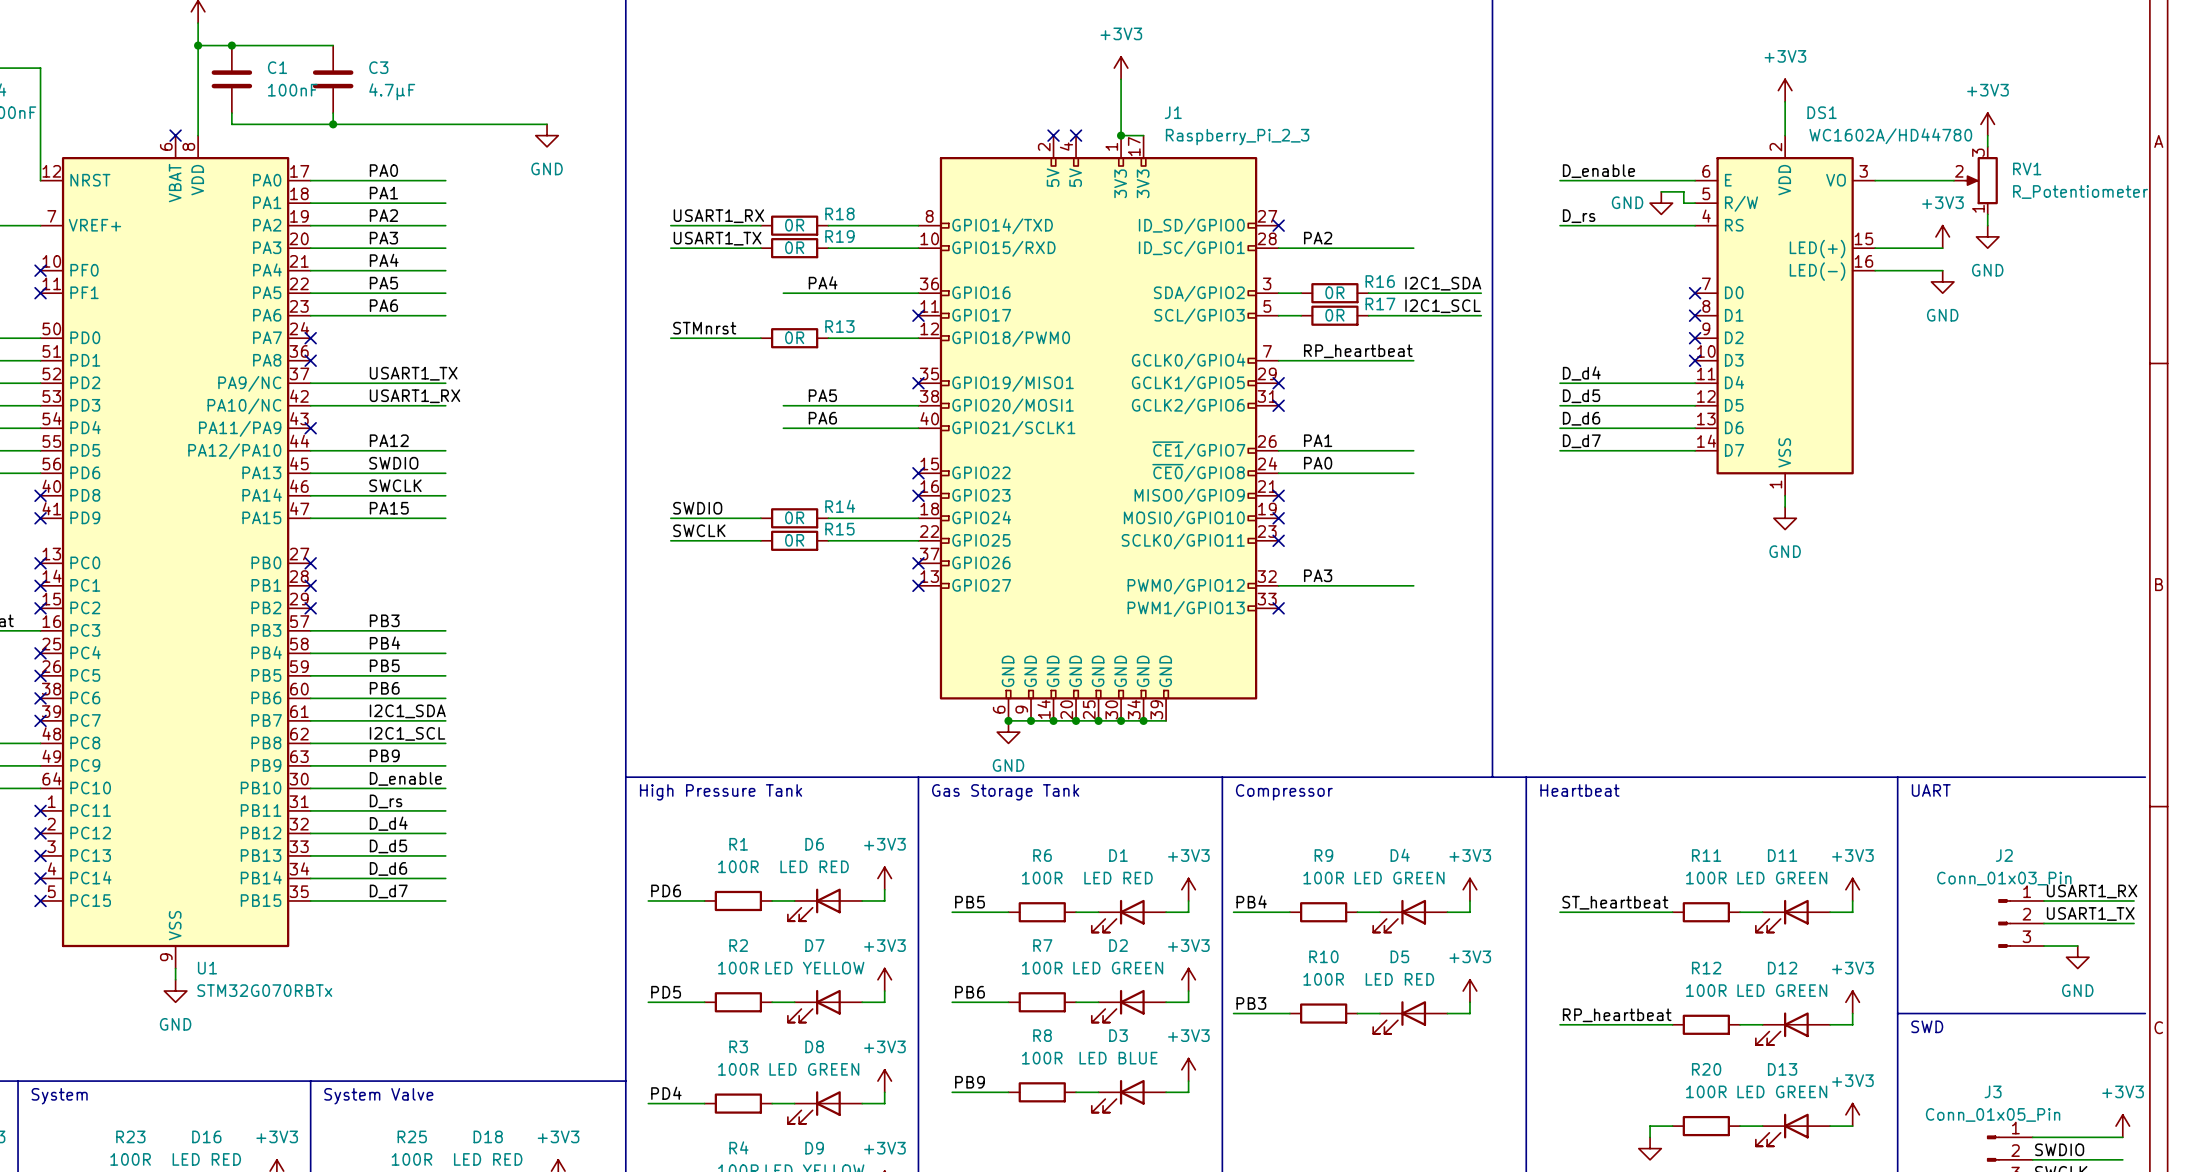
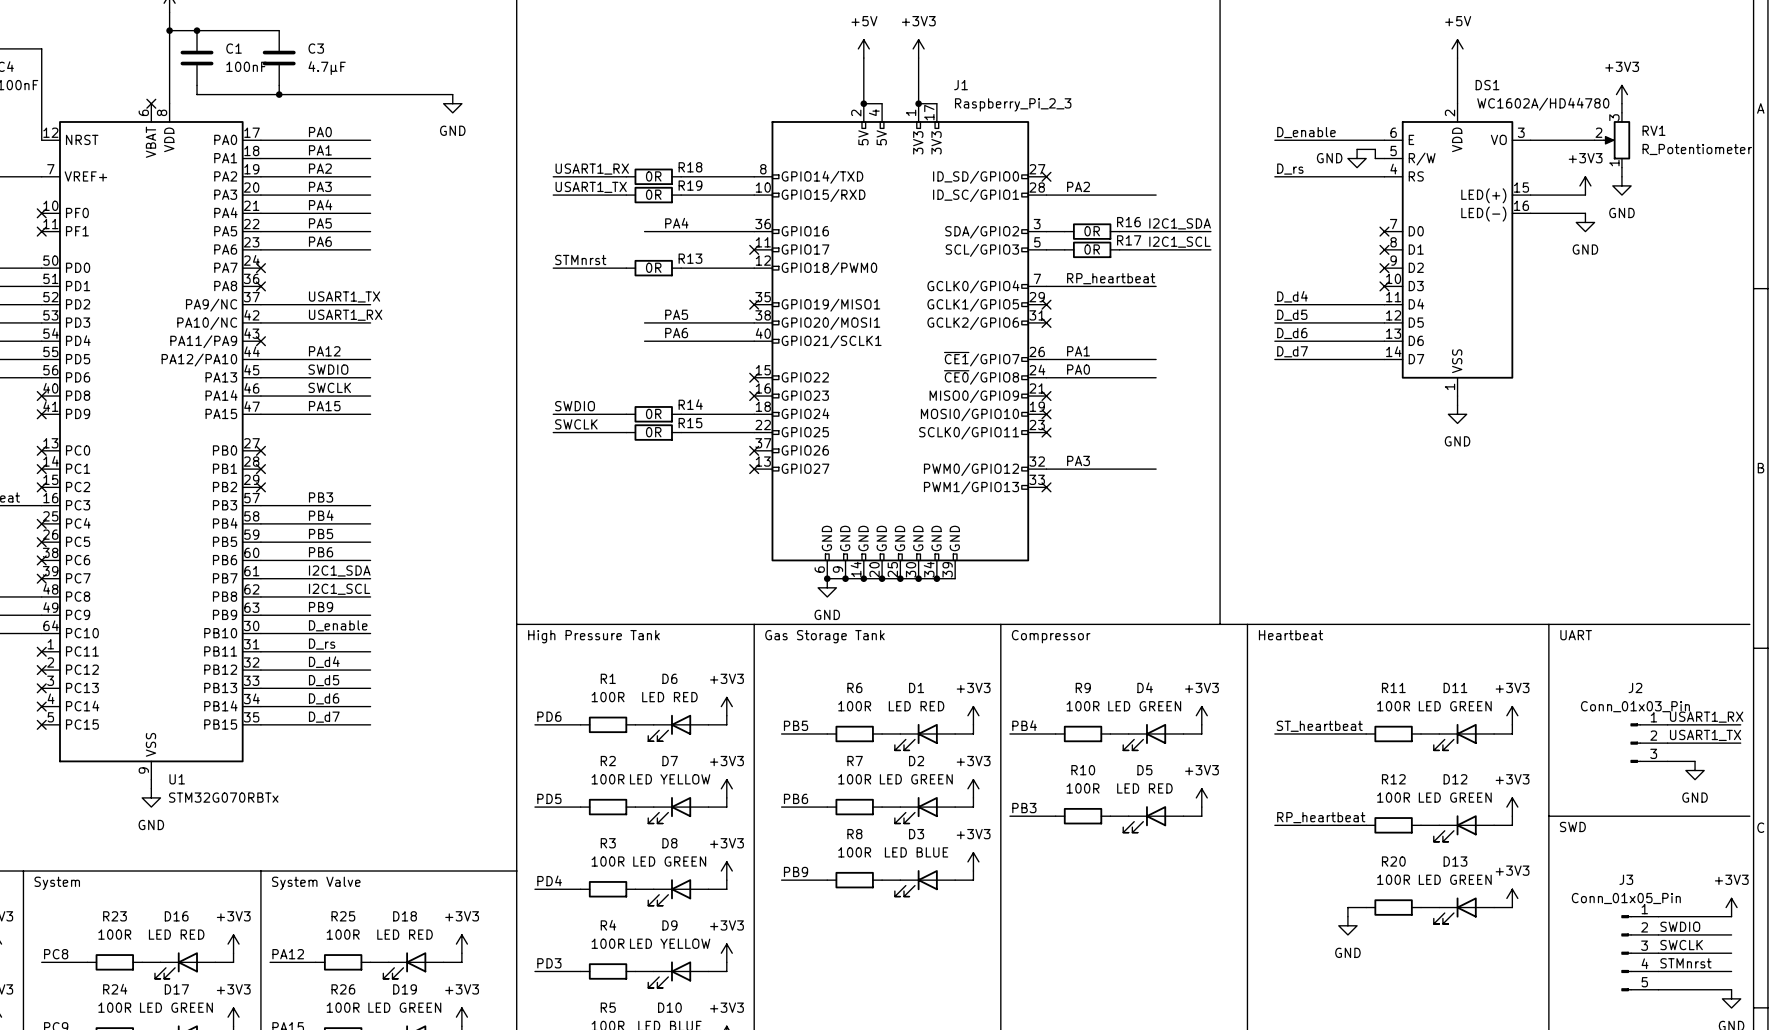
power symbol: none -> +5V (863, 48)
power symbol: none -> +5V (1457, 48)
wire: none -> (863, 58) (863, 103) (882, 103)
power symbol: +3V3 (1785, 90) -> none
no-connect mark: (1053, 135) -> none
junction: none -> (863, 103)
no-connect mark: (1076, 135) -> none

